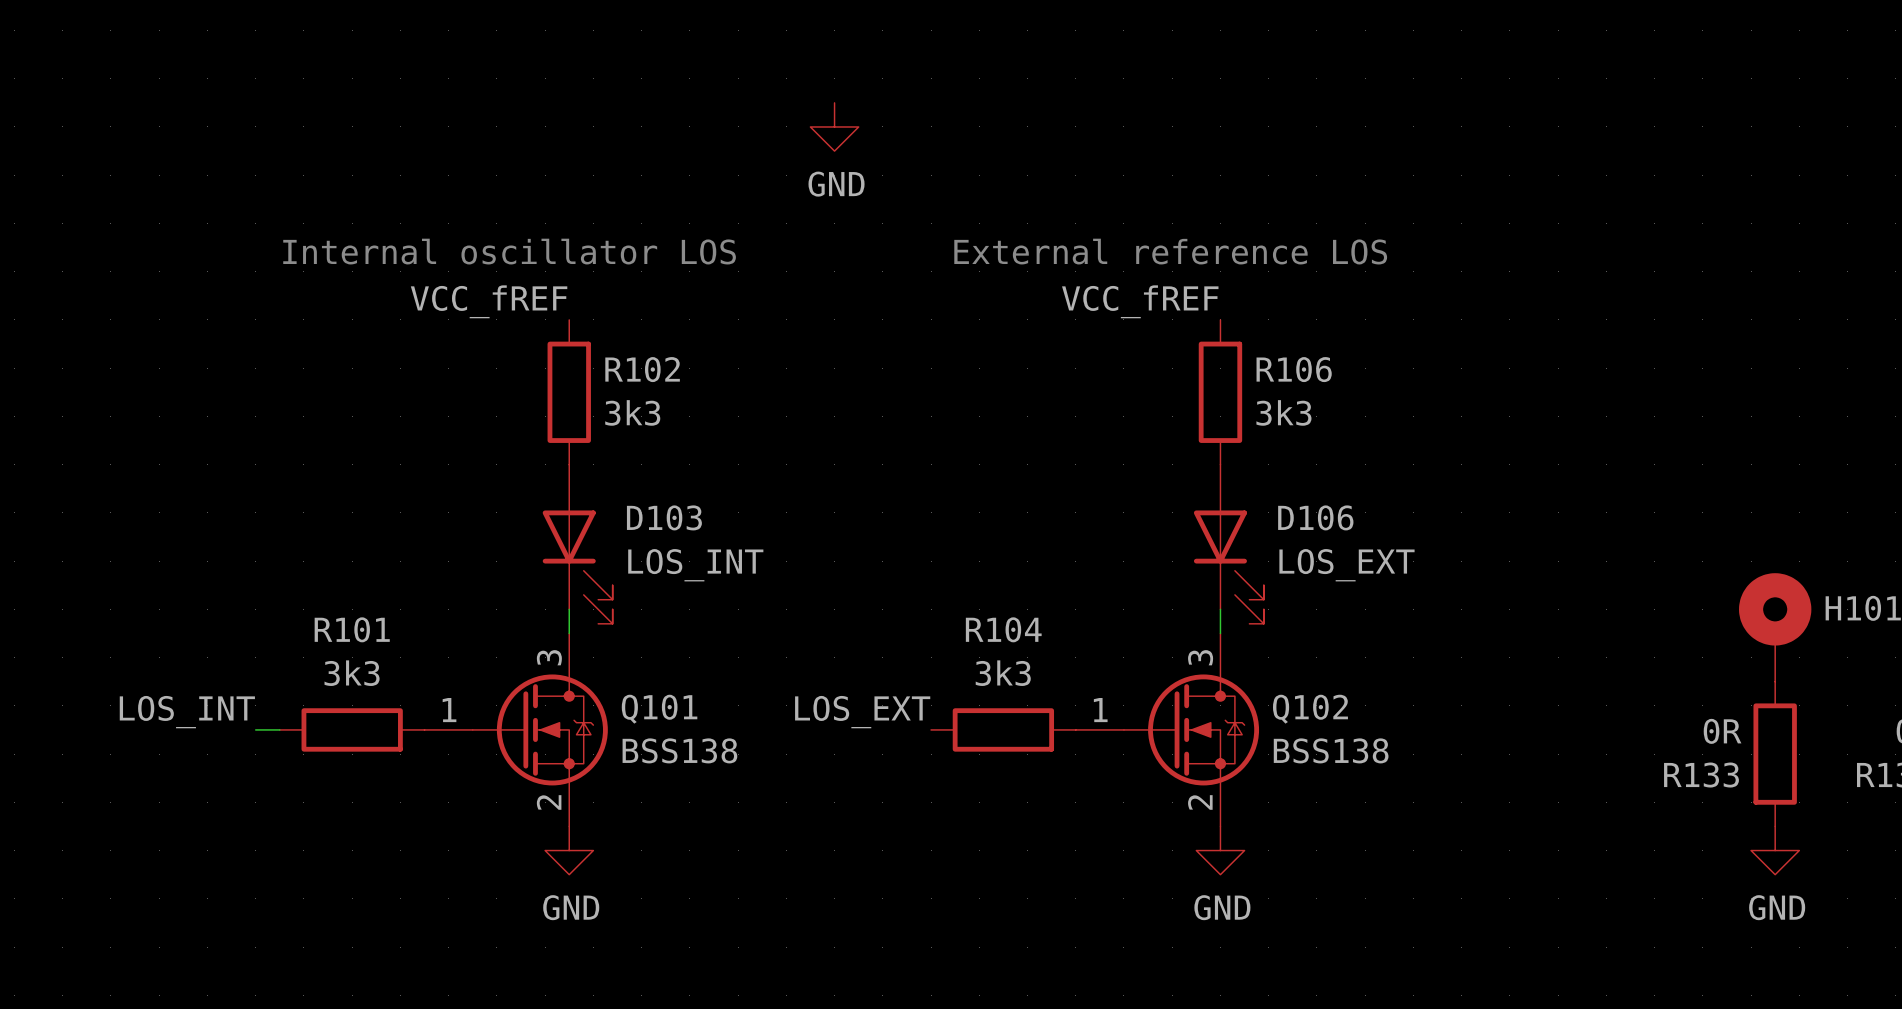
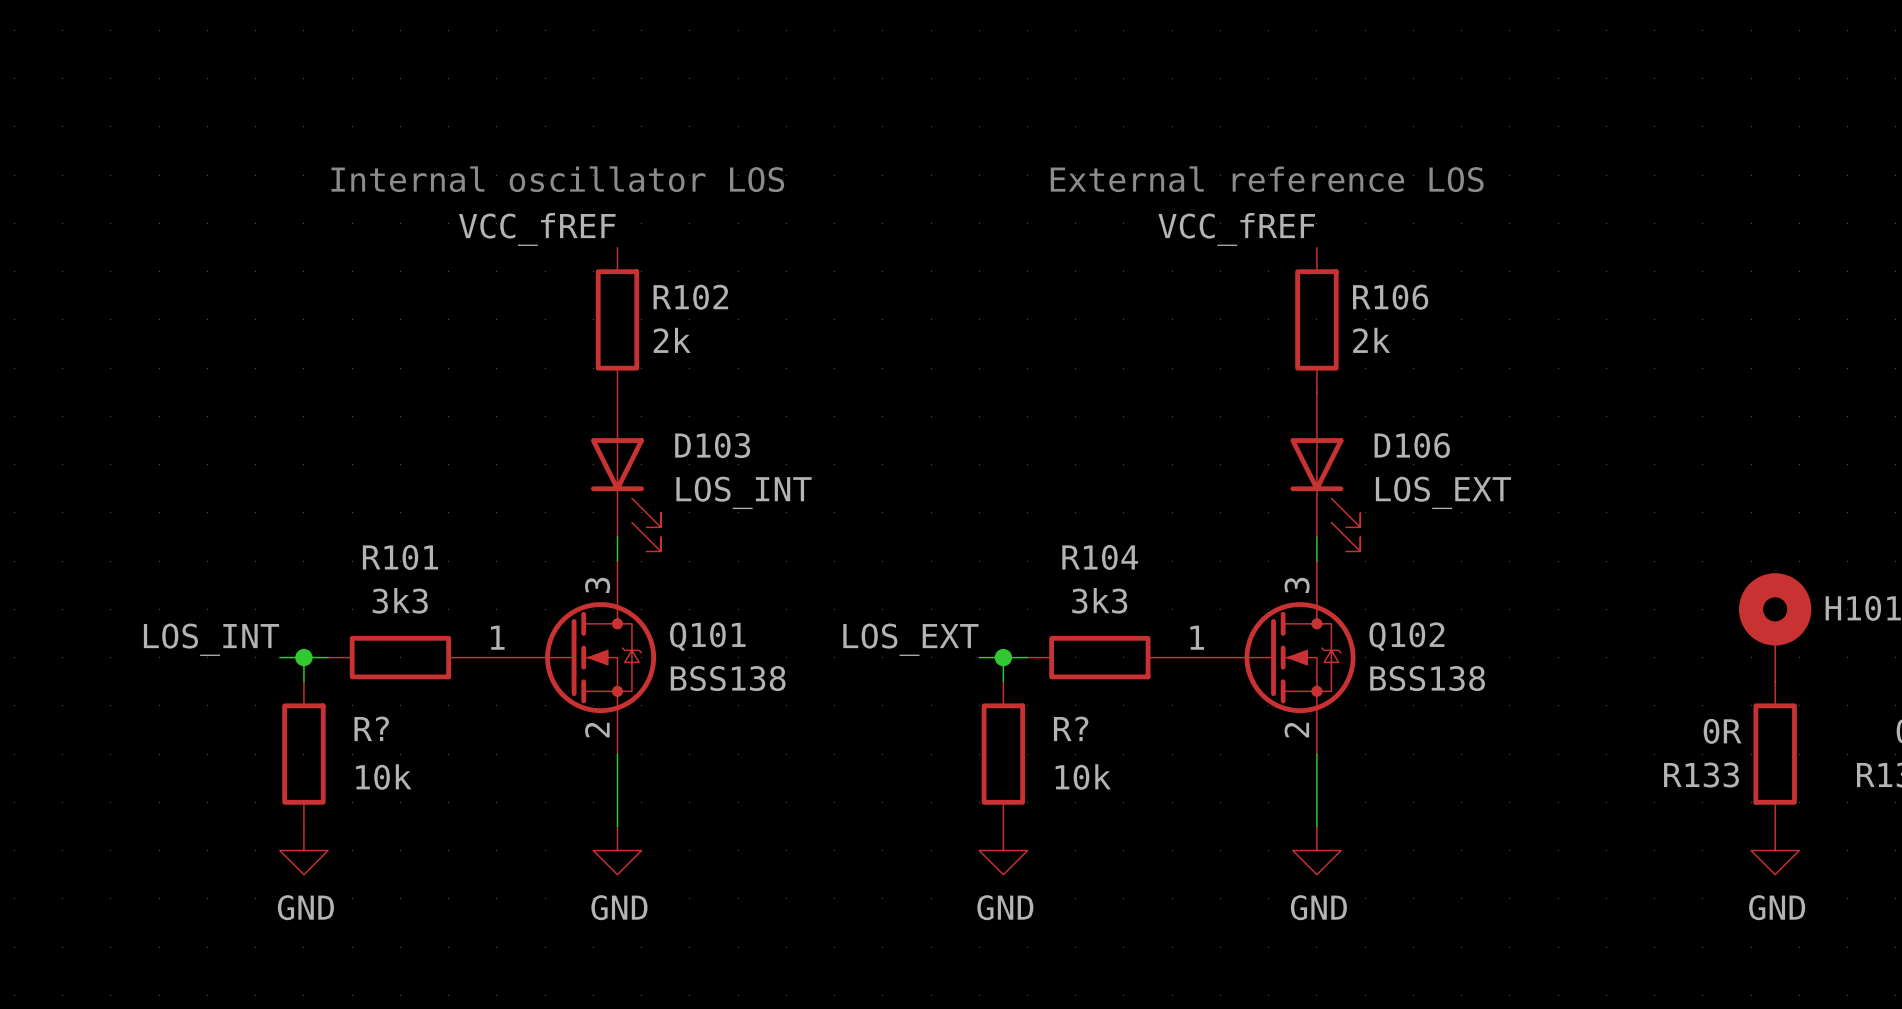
power symbol: GND (834, 126) -> none
text position: Internal oscillator LOS (509, 251) -> Internal oscillator LOS (557, 179)
text position: External reference LOS (1170, 251) -> External reference LOS (1267, 179)
label position: VCC_fREF (489, 301) -> VCC_fREF (537, 229)
label position: VCC_fREF (1140, 301) -> VCC_fREF (1236, 229)
R102 position: (569, 392) -> (617, 319)
R106 position: (1220, 392) -> (1316, 319)
R102 value: 3k3 (632, 412) -> 2k (672, 340)
R106 value: 3k3 (1283, 412) -> 2k (1371, 340)
D103 position: (577, 544) -> (625, 471)
D106 position: (1228, 544) -> (1325, 471)
wire: (569, 609) (569, 633) -> (617, 537) (617, 561)
wire: (1220, 609) (1220, 633) -> (1316, 537) (1316, 561)
wire: none -> (279, 657) (328, 657)
wire: none -> (303, 657) (303, 681)
junction: none -> (303, 657)
wire: none -> (979, 657) (1027, 657)
wire: none -> (1003, 657) (1003, 681)
junction: none -> (1003, 657)
label position: LOS_INT (187, 712) -> LOS_INT (211, 639)
label position: LOS_EXT (862, 712) -> LOS_EXT (910, 639)
wire: (255, 729) (279, 729) -> none
R101 position: (352, 729) -> (400, 657)
Q101 position: (516, 729) -> (564, 657)
R104 position: (1003, 729) -> (1099, 657)
Q102 position: (1167, 729) -> (1263, 657)
R?: none -> 10k (303, 754)
wire: none -> (617, 754) (617, 826)
R?: none -> 10k (1003, 754)
wire: none -> (1316, 754) (1316, 826)
power symbol: none -> GND (303, 850)
power symbol position: GND (569, 850) -> GND (617, 850)
power symbol: none -> GND (1003, 850)
power symbol position: GND (1220, 850) -> GND (1316, 850)

